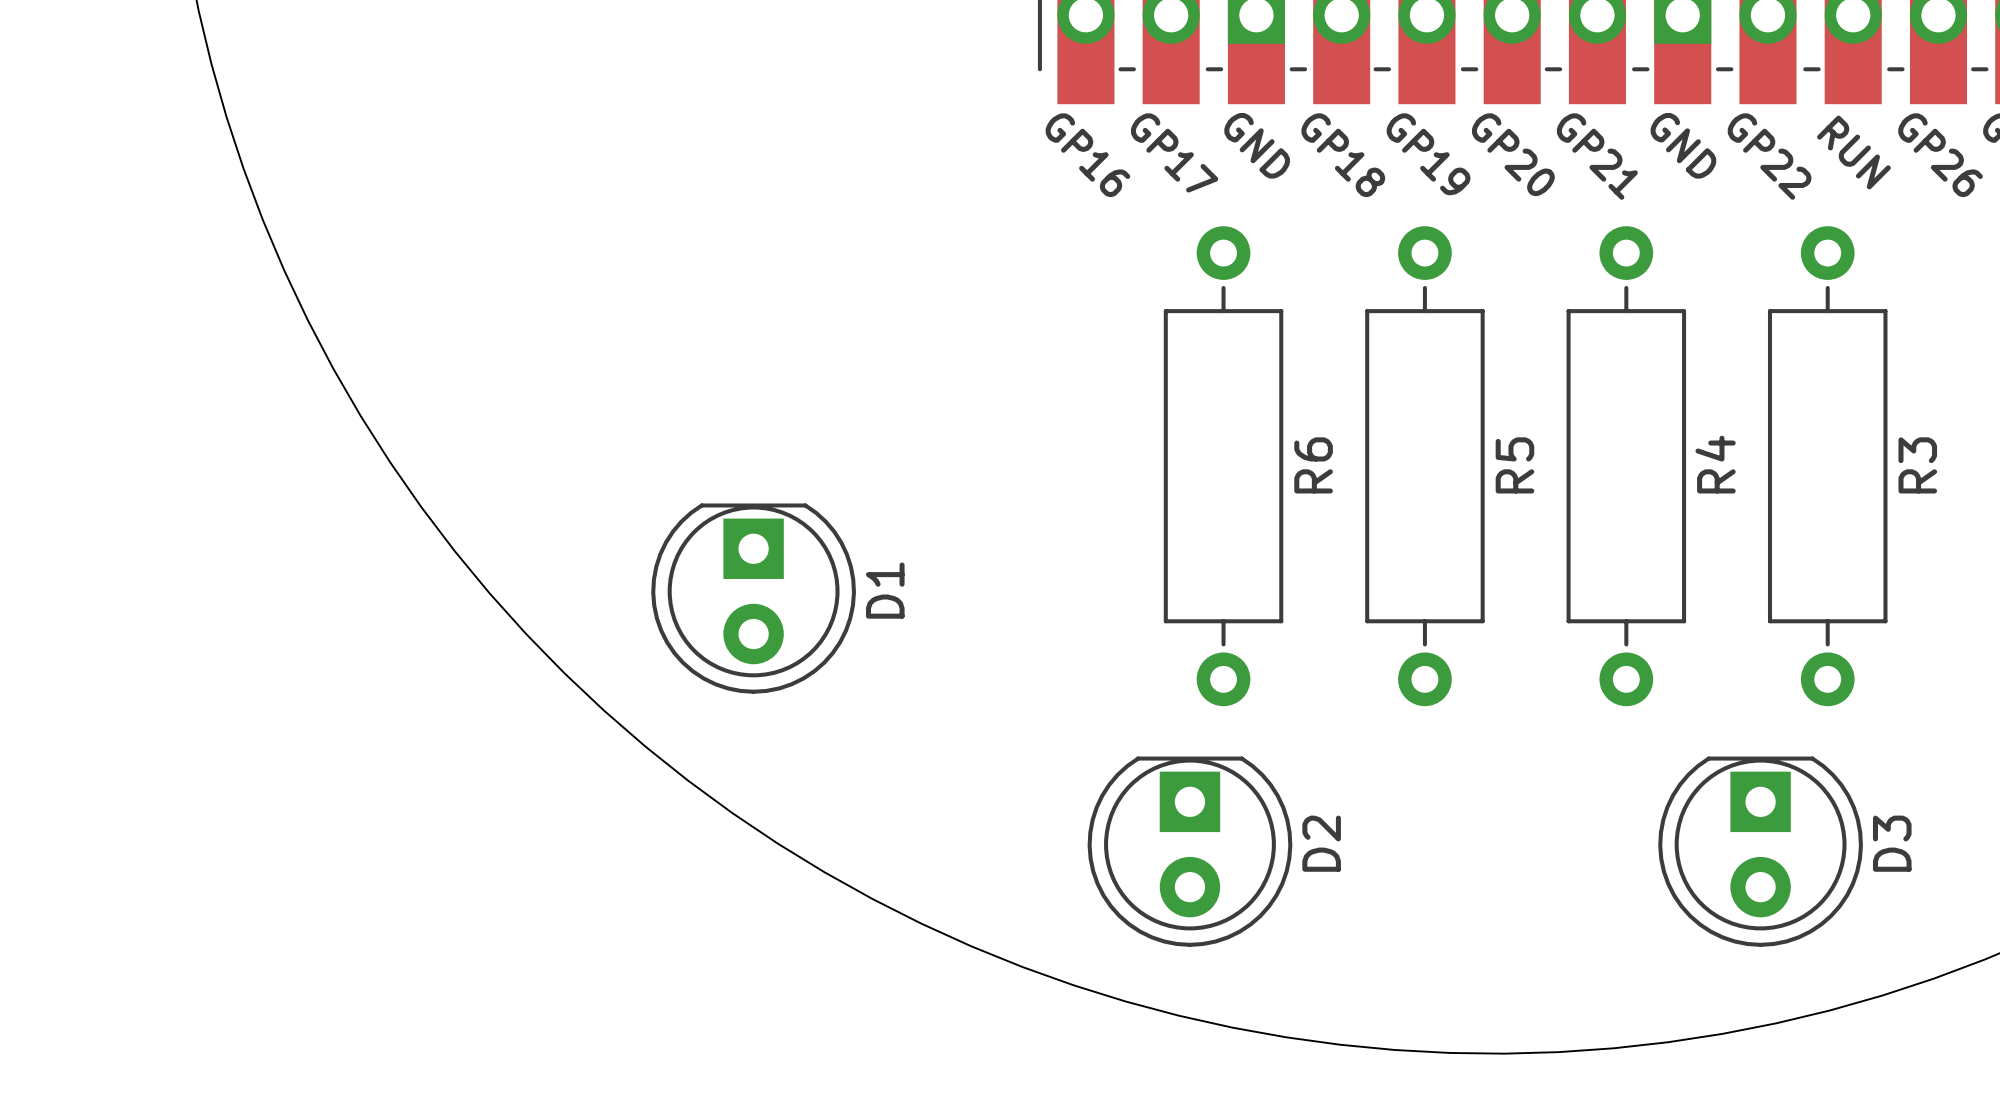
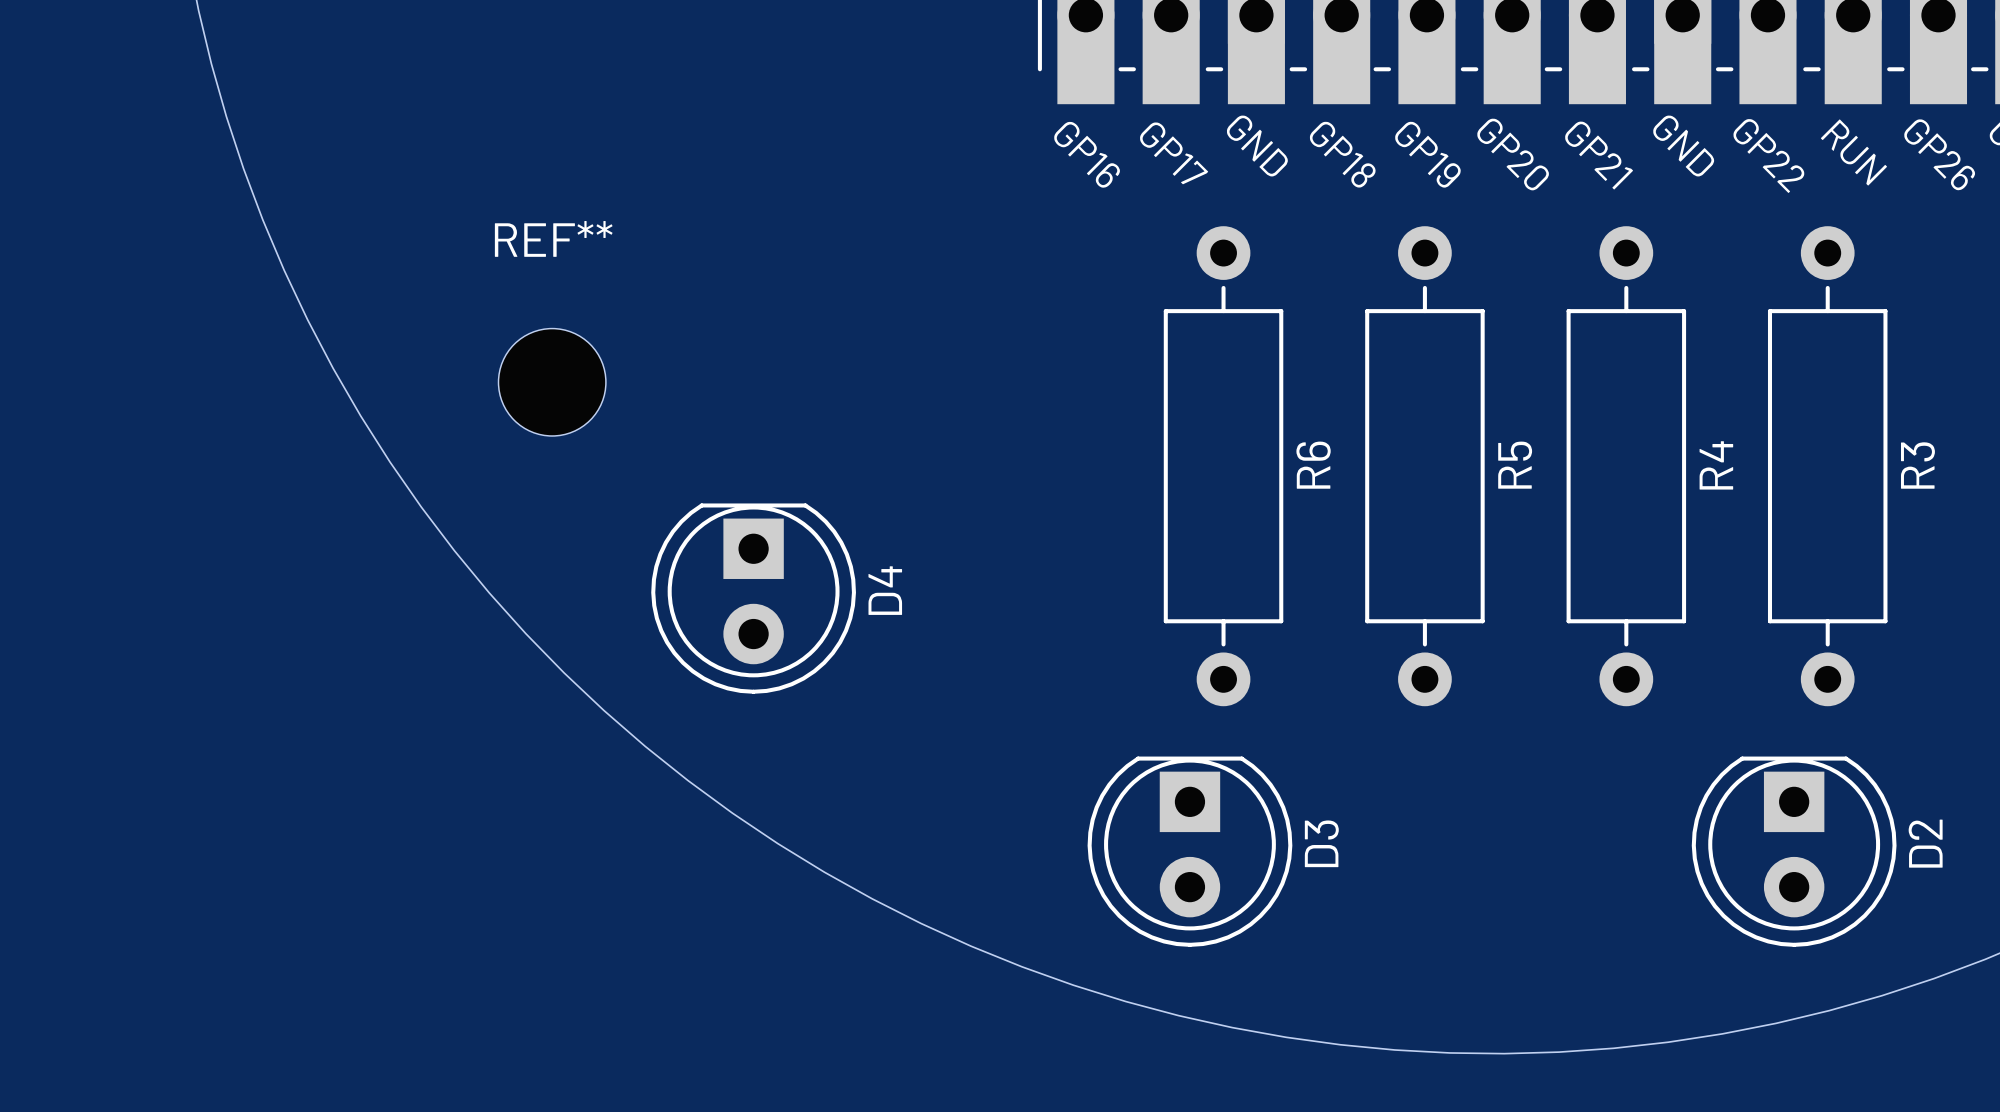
REF**: none -> (552, 382)
D1 name: D1 (885, 590) -> D4 (885, 590)
D2 name: D2 (1321, 843) -> D3 (1321, 843)
D3 name: D3 (1892, 843) -> D2 (1925, 843)
D3 position: (1760, 851) -> (1794, 851)

